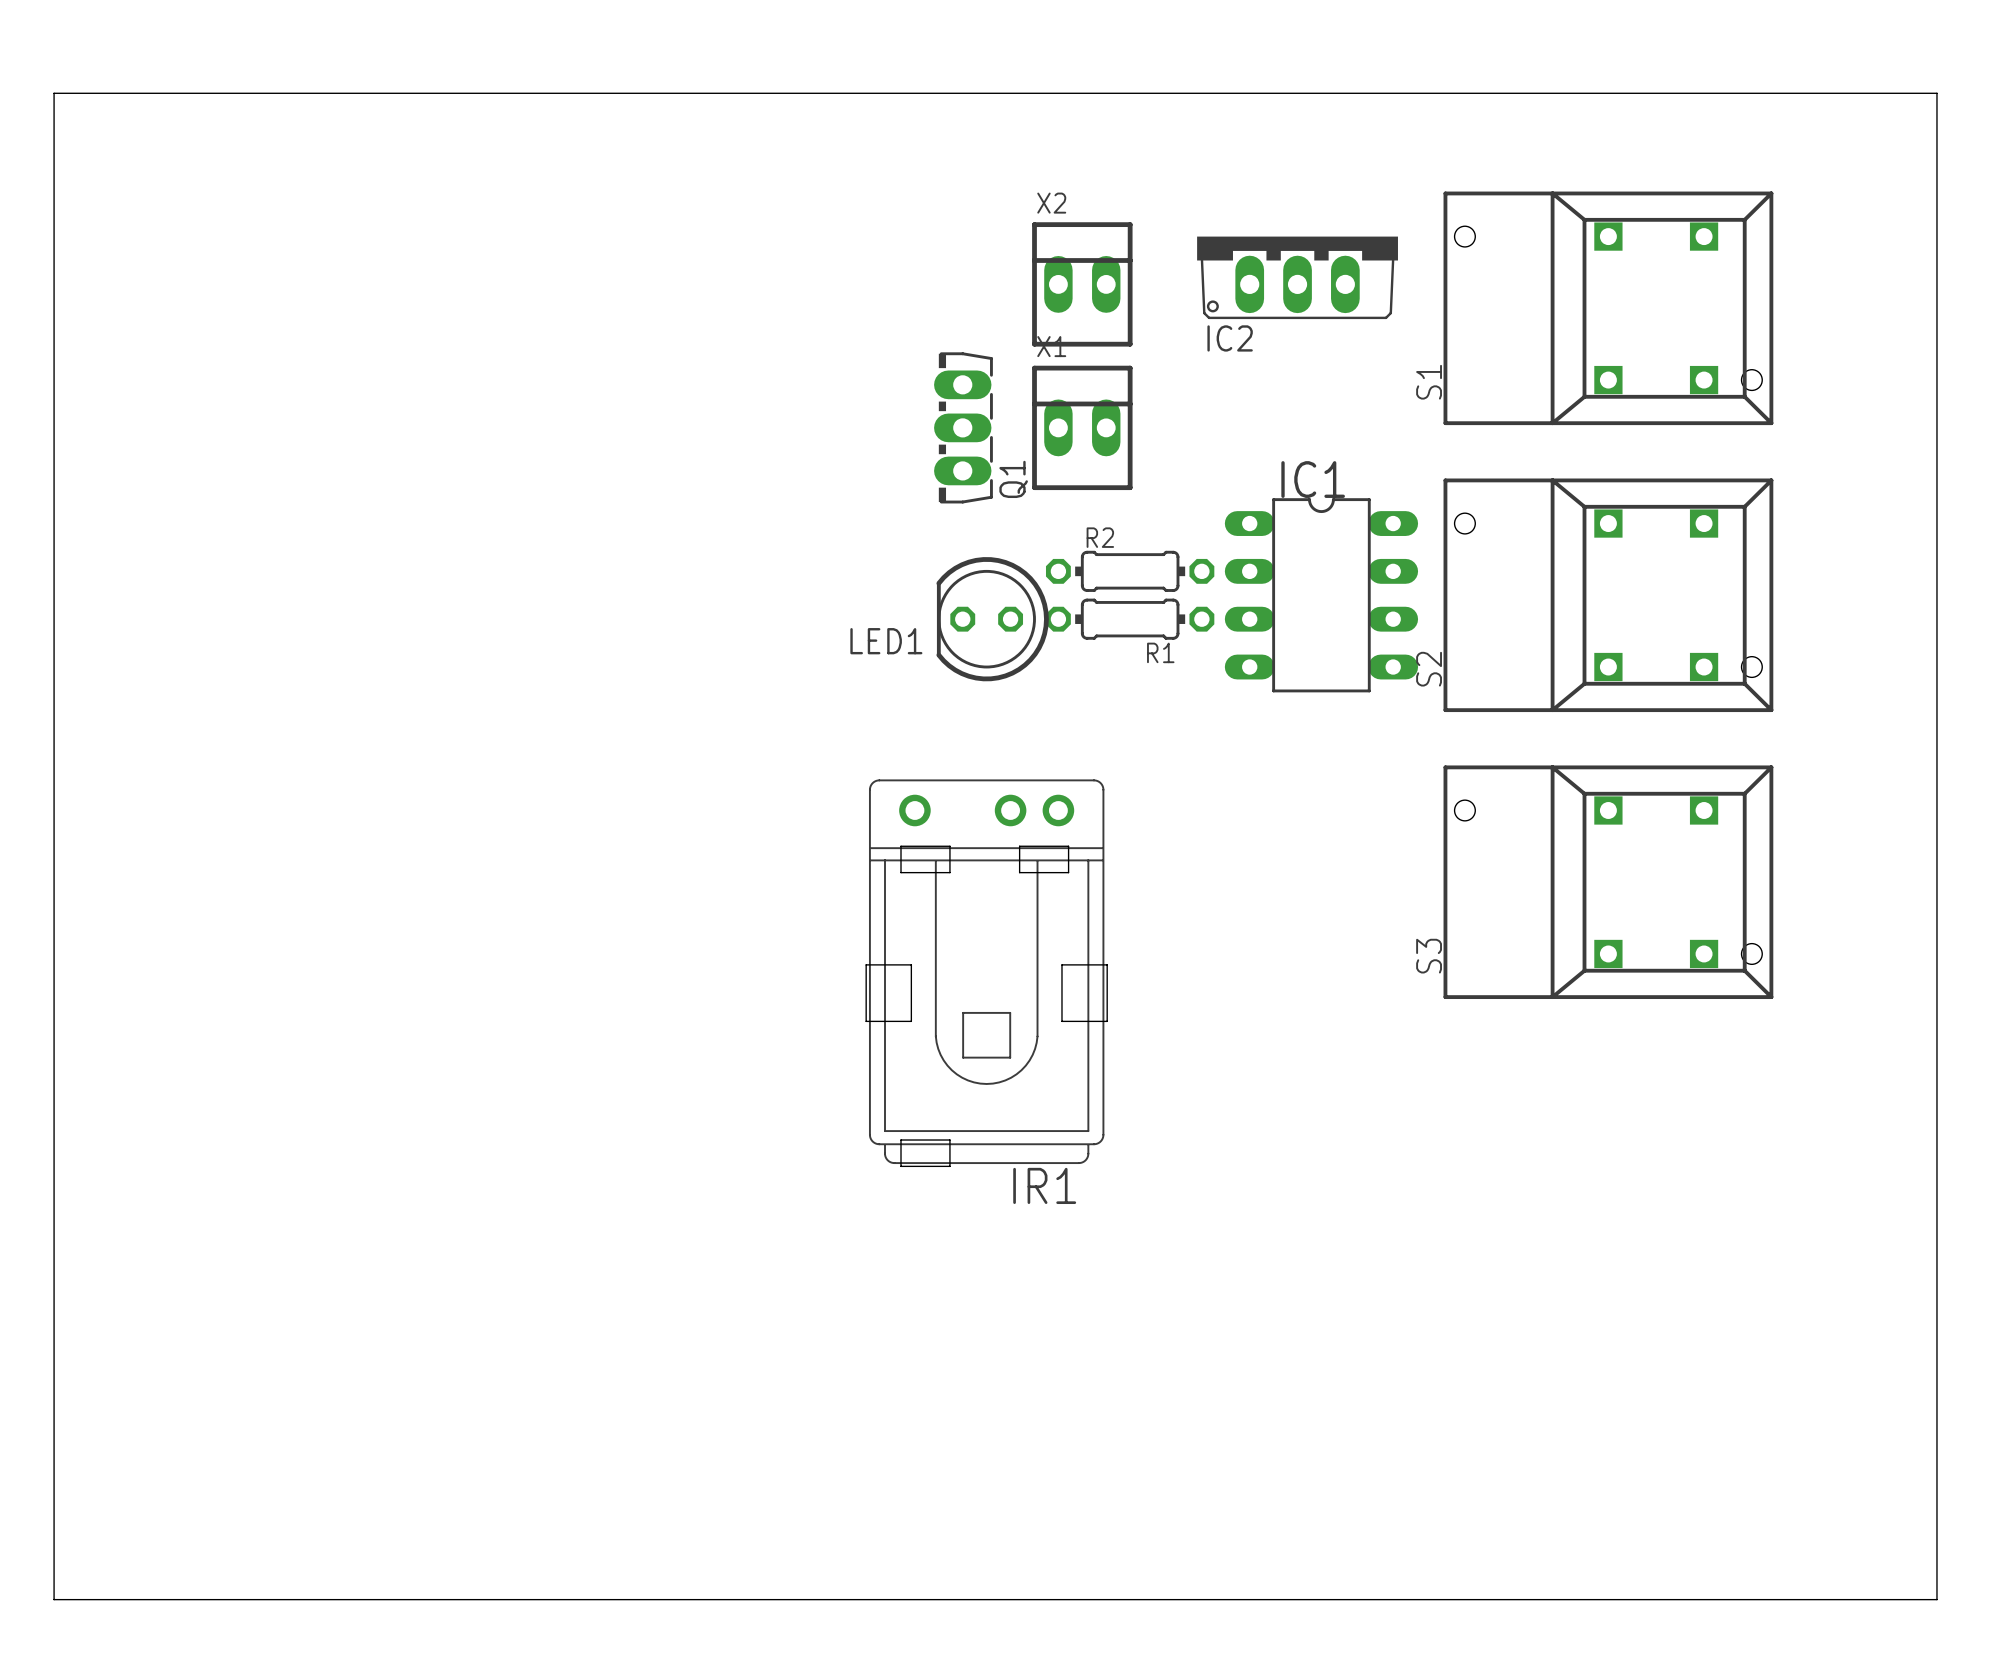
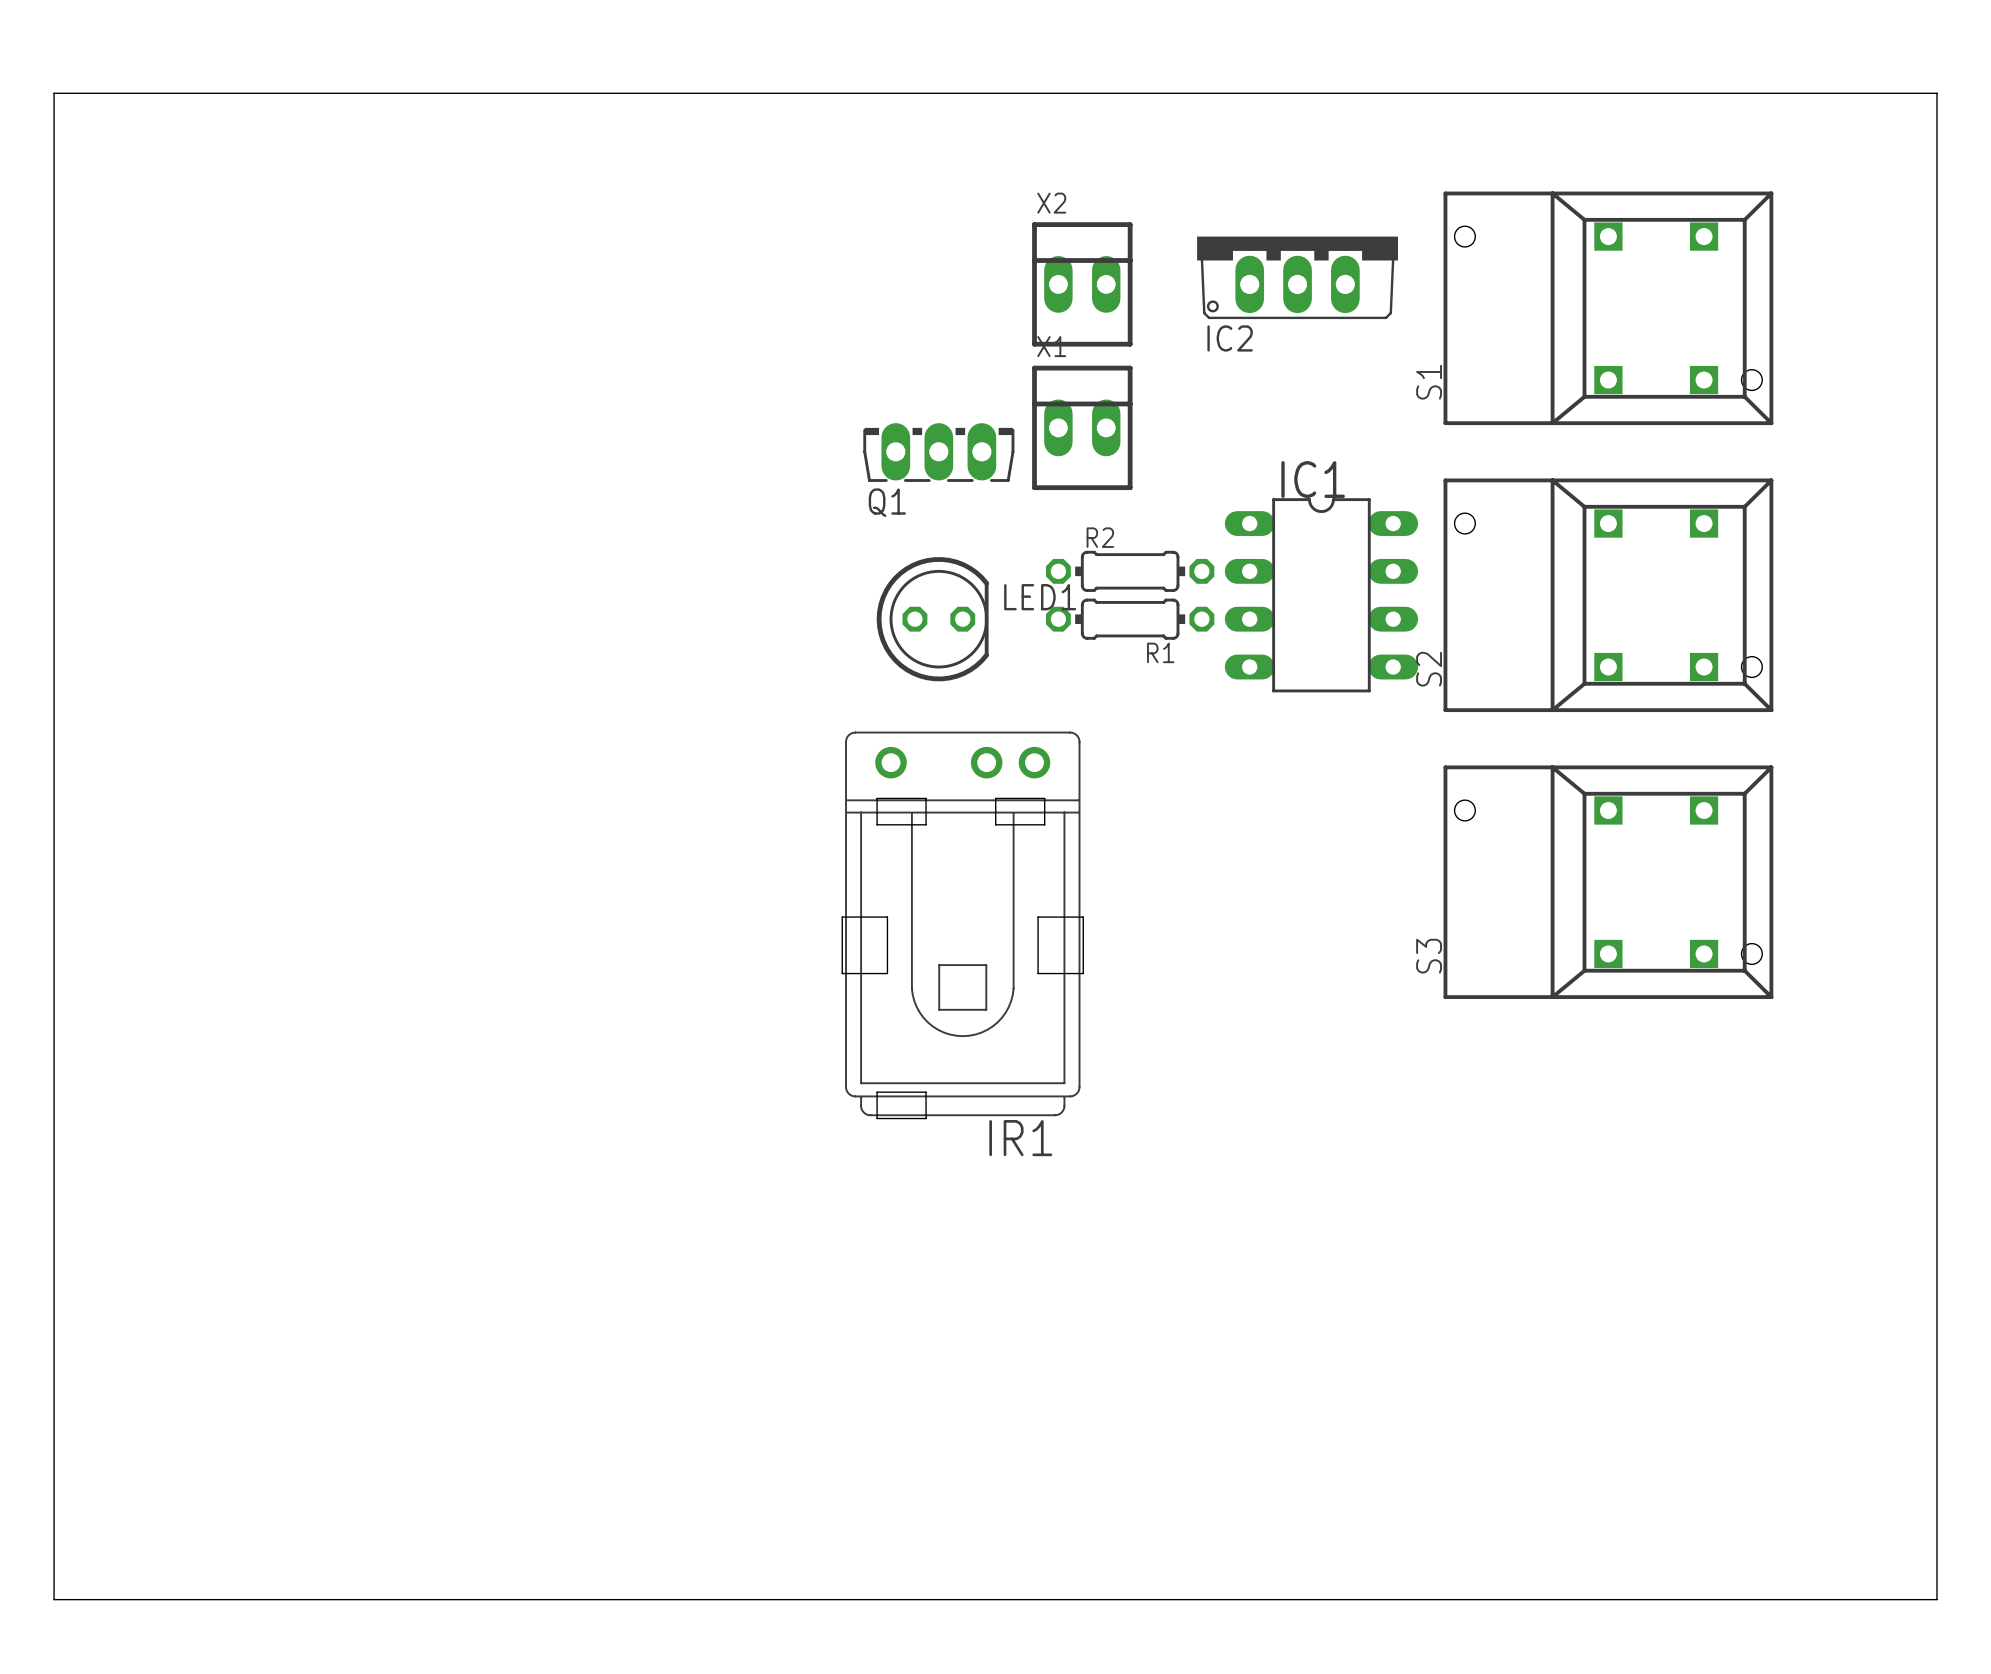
Q1 rotation: 0° (963, 427) -> 90° clockwise (938, 452)
LED1 rotation: 0° (992, 619) -> 180° (932, 619)
IR1 position: (986, 972) -> (962, 925)

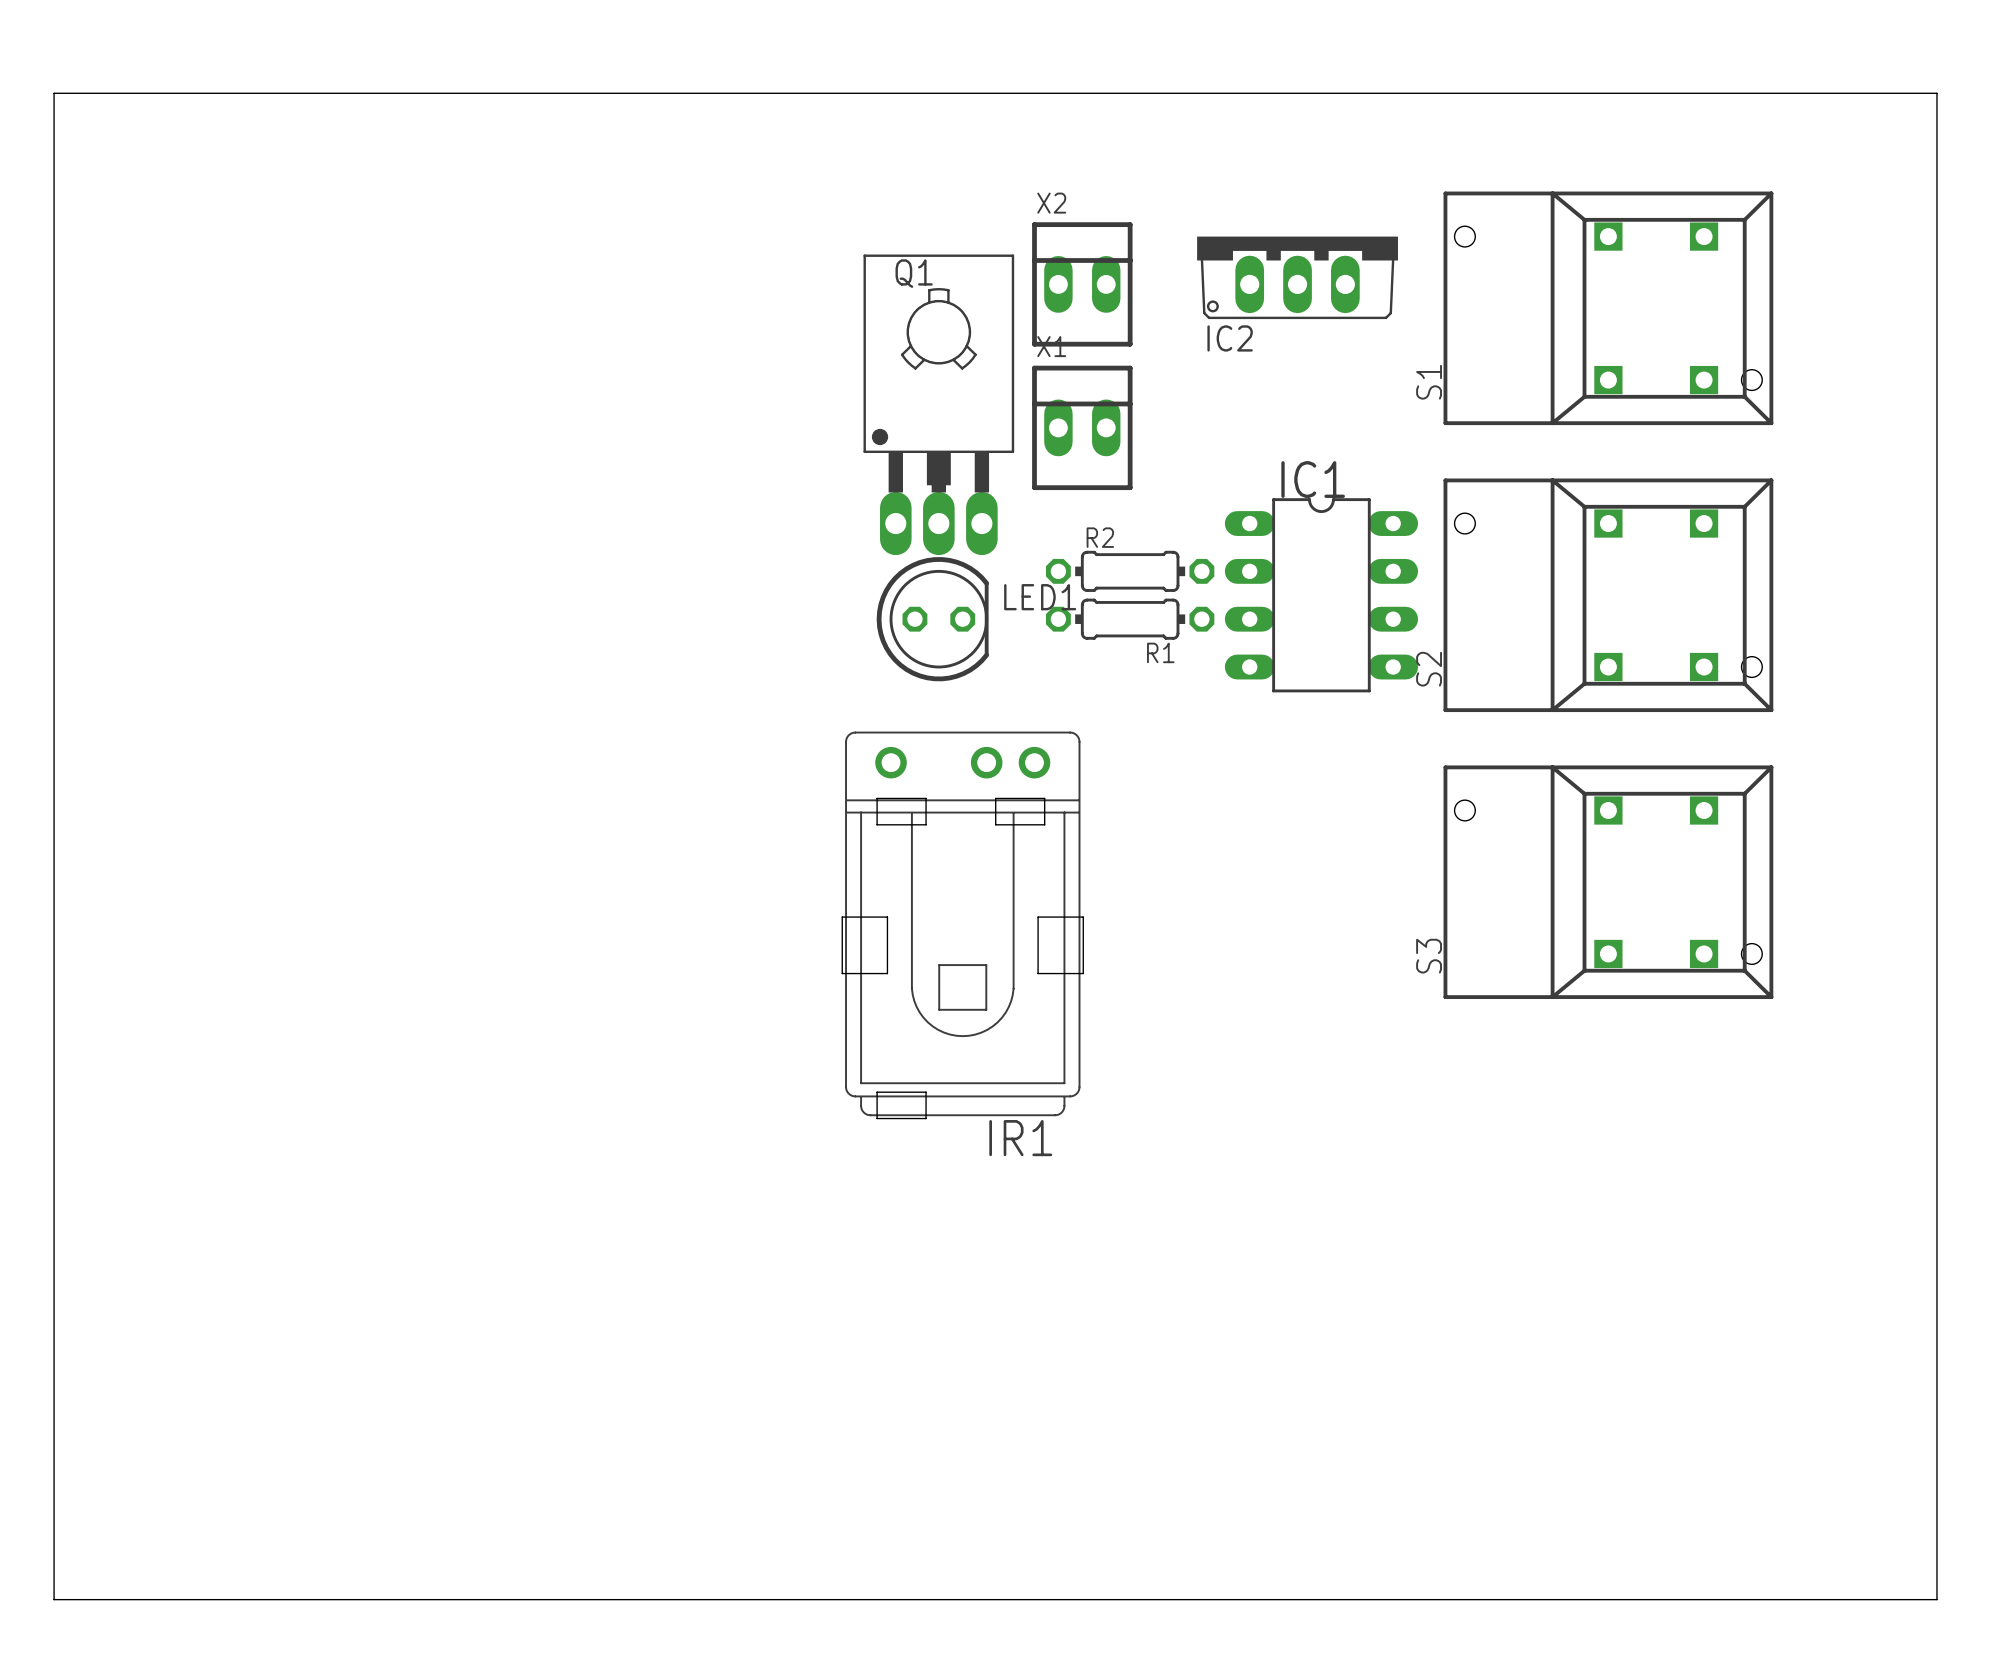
Q1 footprint: [863, 423, 1015, 482] -> [863, 254, 1015, 556]
Q1 name position: Q1 (887, 502) -> Q1 (914, 273)

